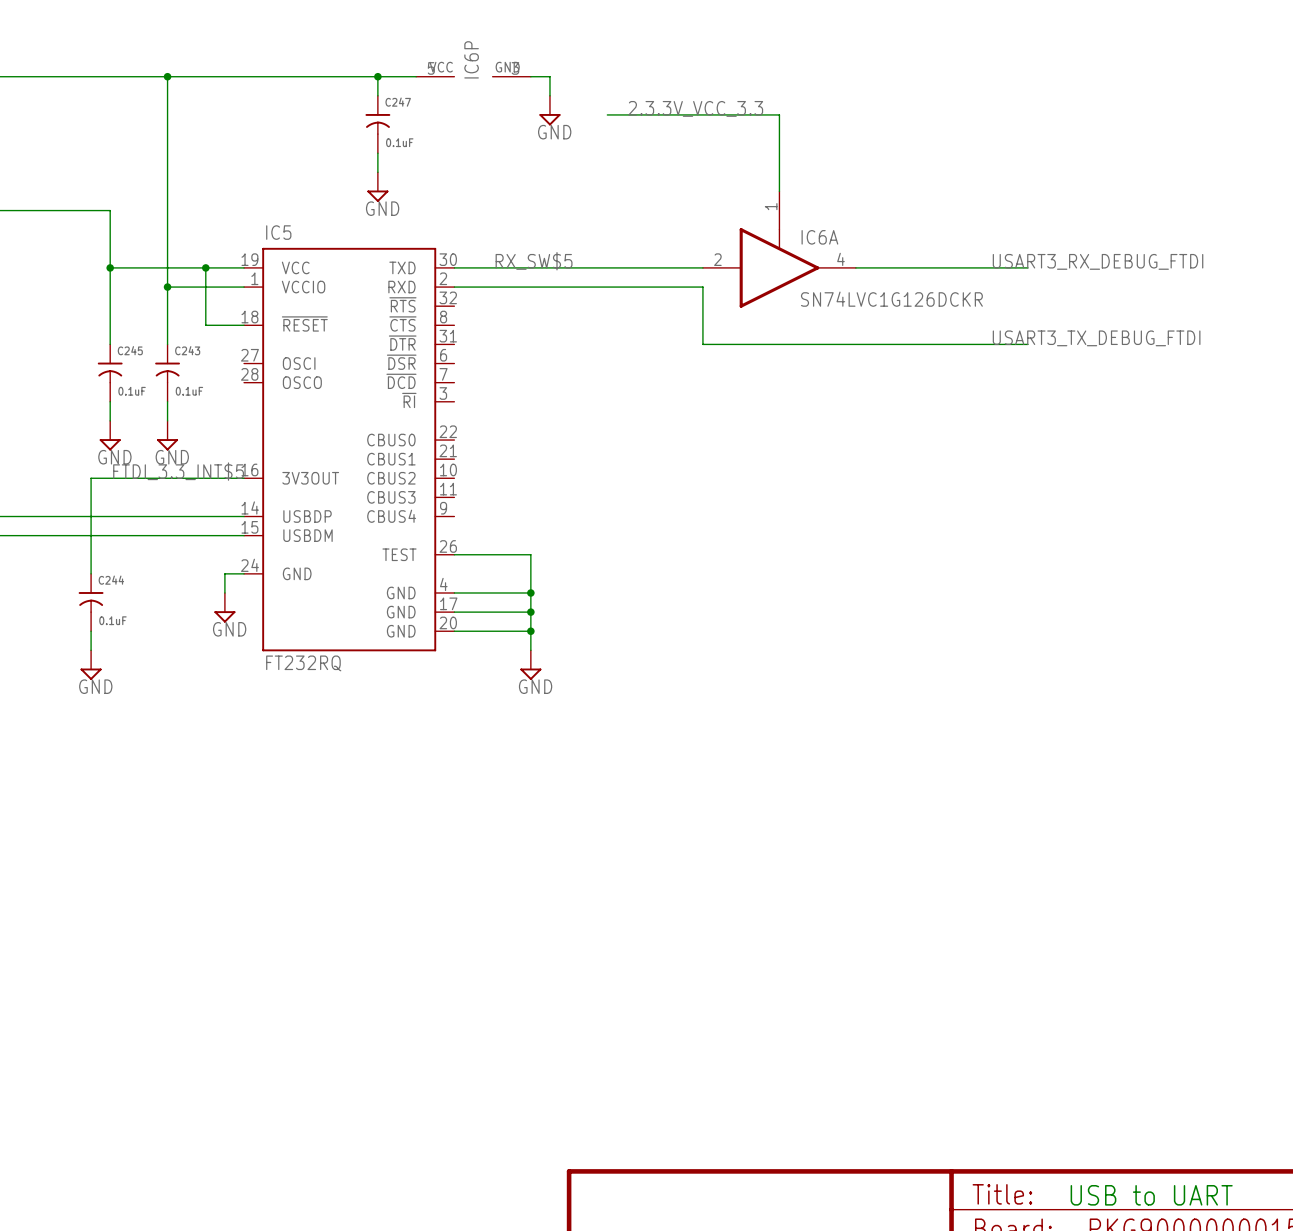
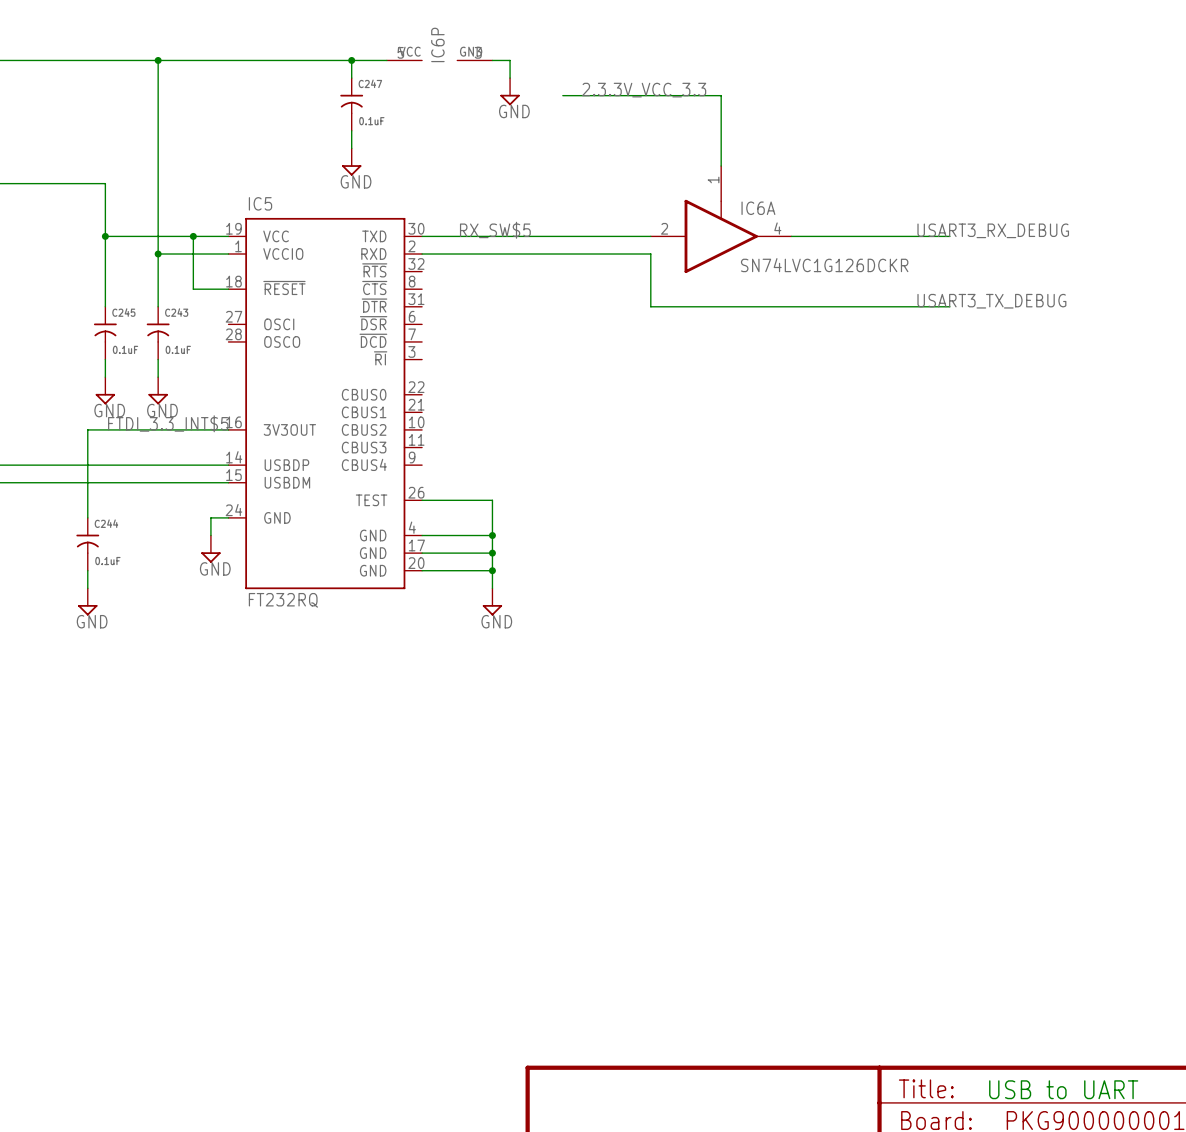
label: USART3_RX_DEBUG_FTDI (1098, 261) -> USART3_RX_DEBUG (993, 230)
label: USART3_TX_DEBUG_FTDI (1096, 338) -> USART3_TX_DEBUG (991, 301)

